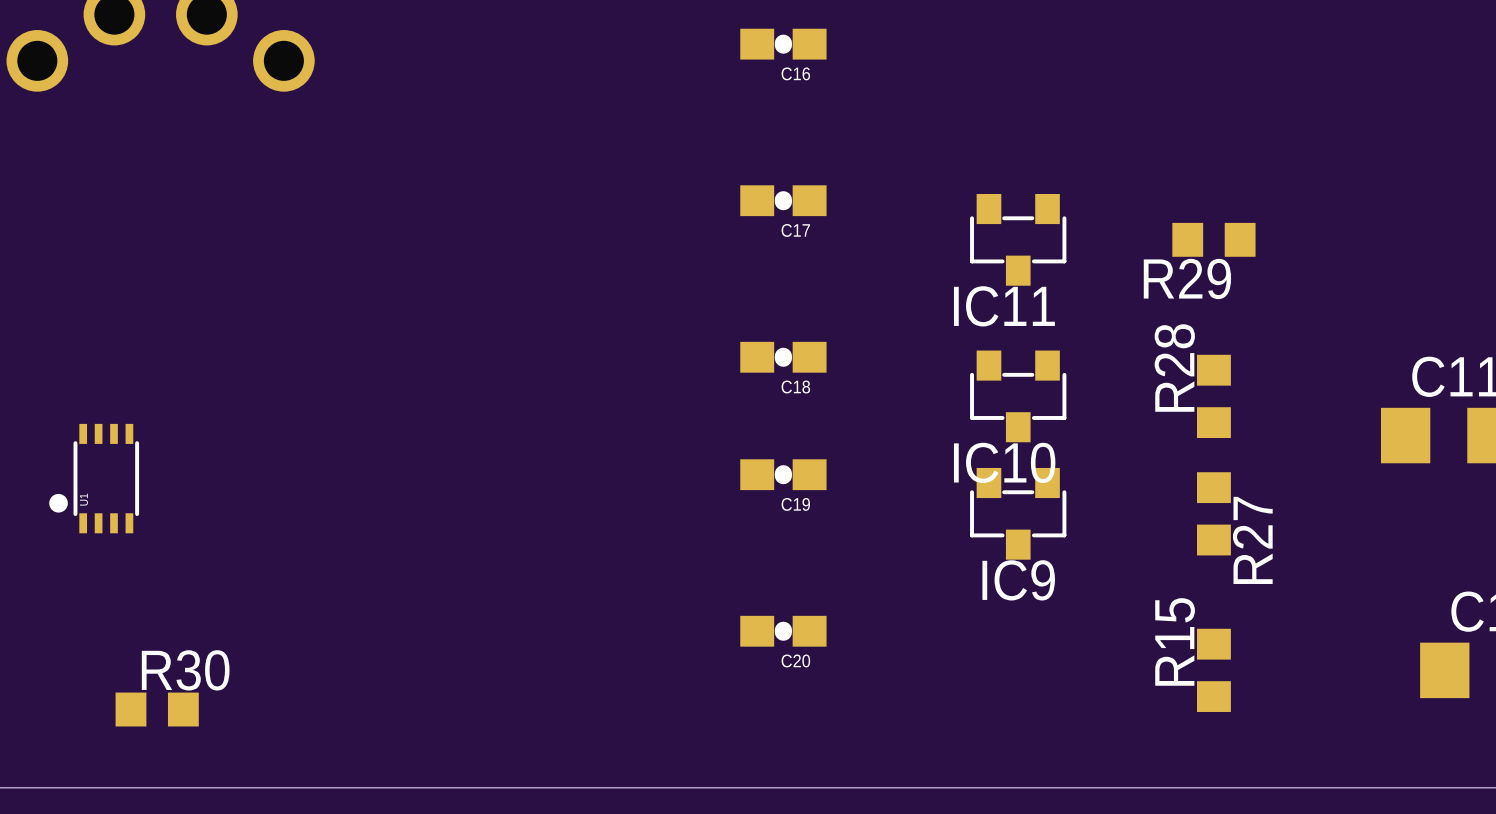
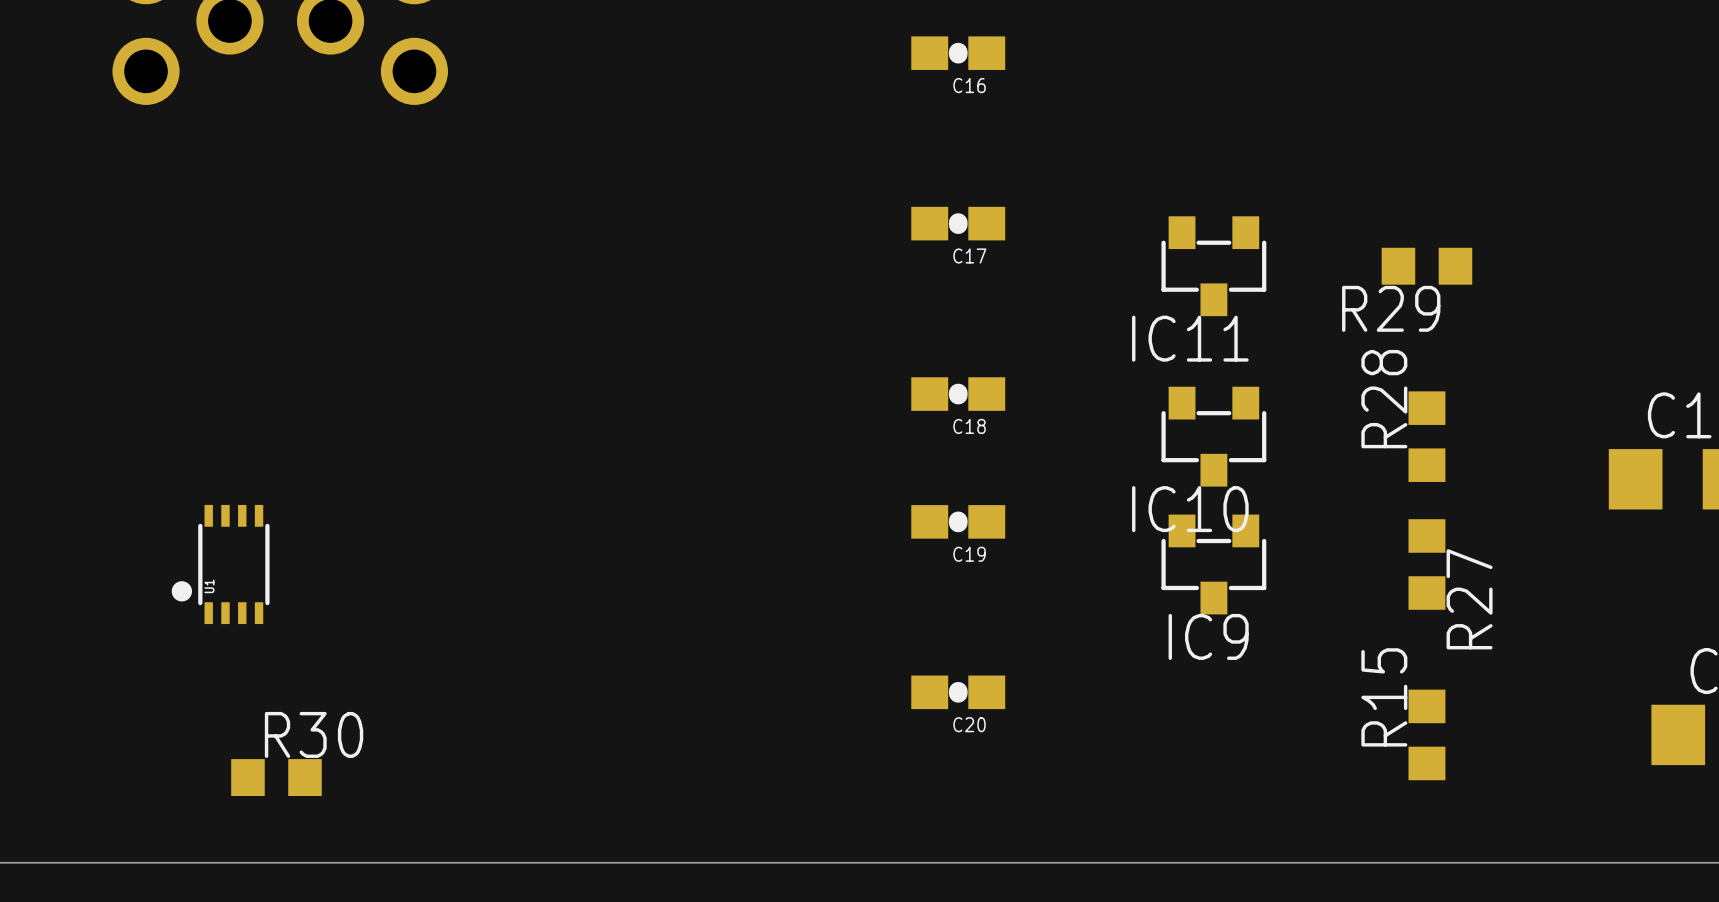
U1 position: (94, 478) -> (220, 564)

